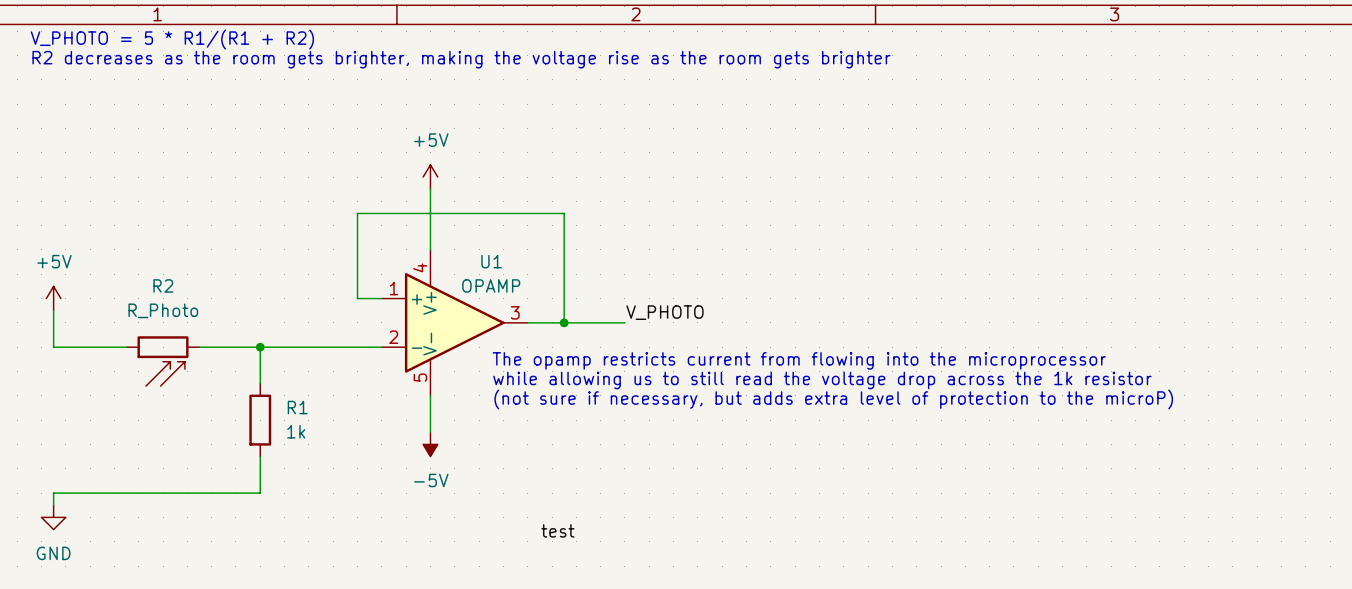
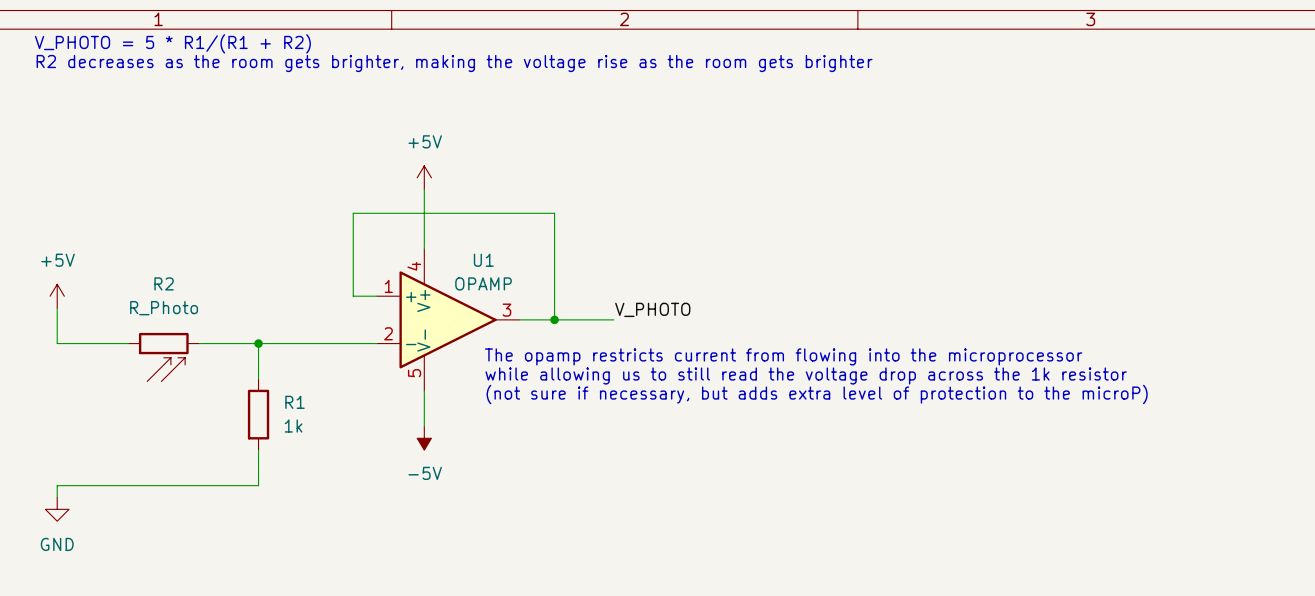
label: test (557, 530) -> none

